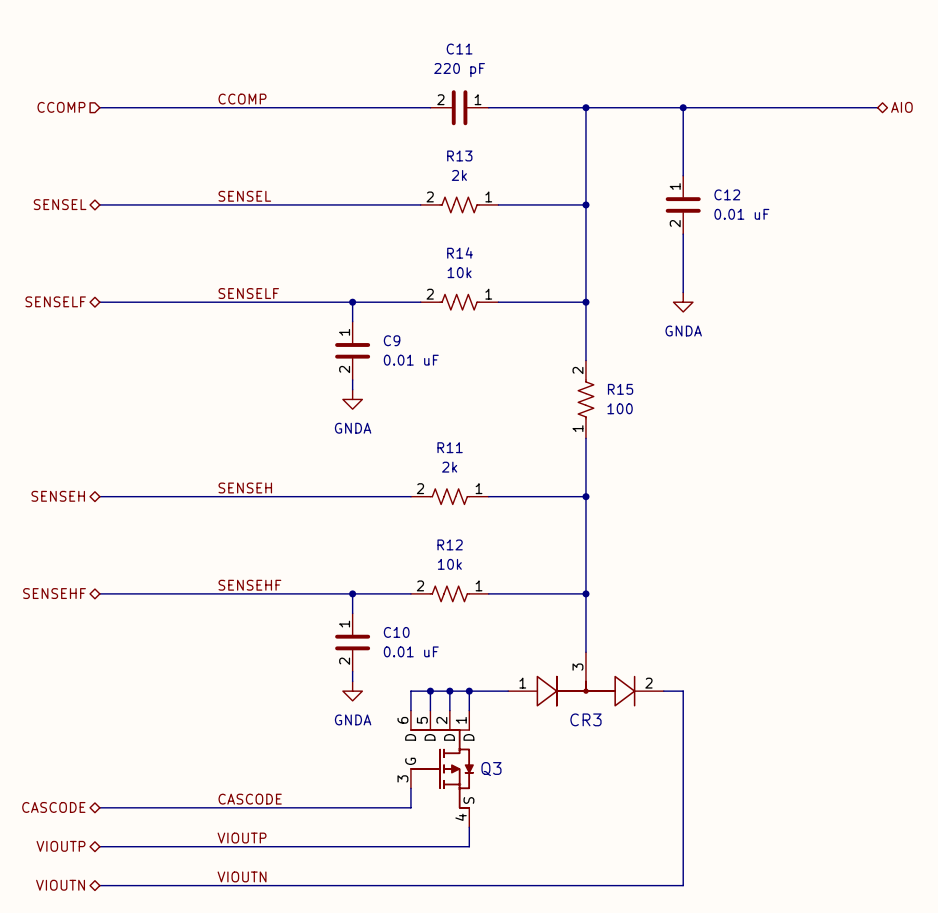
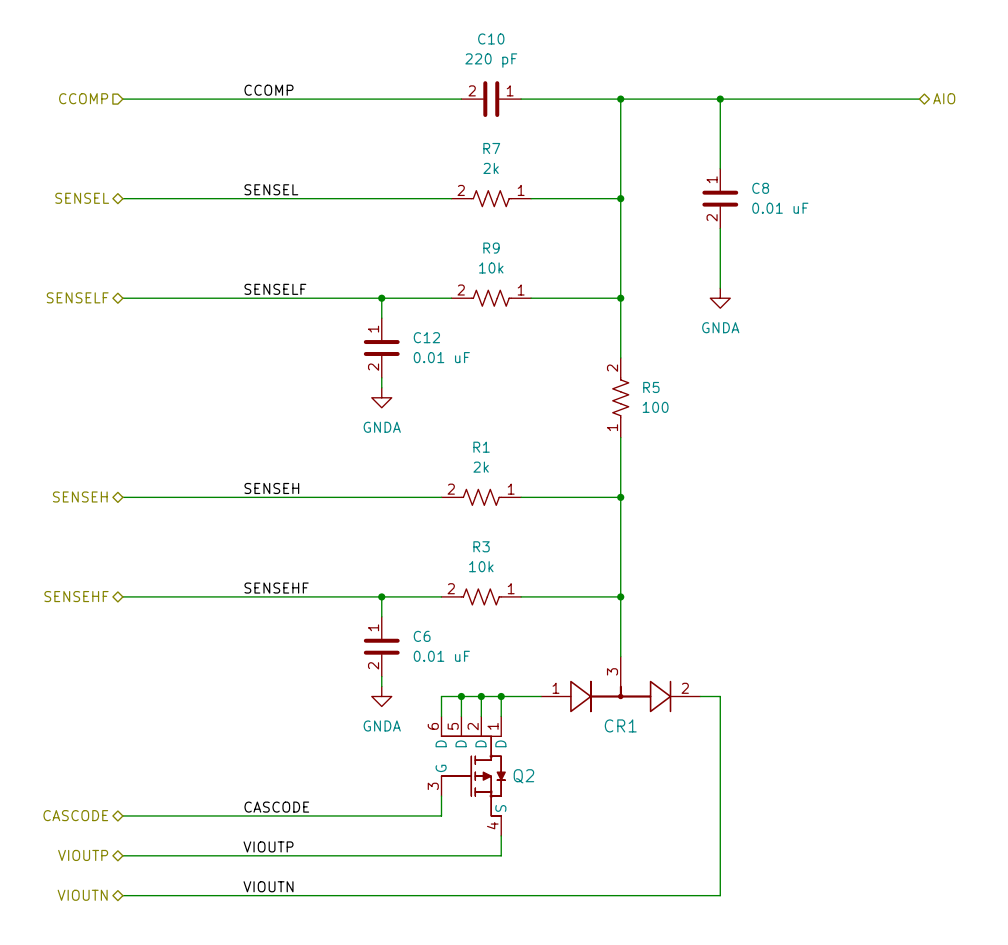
C11 name: C11 (459, 49) -> C10 (491, 38)
R13 name: R13 (459, 155) -> R7 (491, 148)
C12 name: C12 (727, 194) -> C8 (760, 188)
R14 name: R14 (460, 252) -> R9 (491, 248)
C9 name: C9 (392, 340) -> C12 (426, 337)
R15 name: R15 (620, 389) -> R5 (651, 387)
R11 name: R11 (450, 447) -> R1 (481, 447)
R12 name: R12 (450, 544) -> R3 (481, 546)
C10 name: C10 (396, 632) -> C6 (422, 636)
CR3 name: CR3 (585, 719) -> CR1 (620, 725)
Q3 name: Q3 (491, 769) -> Q2 (523, 776)

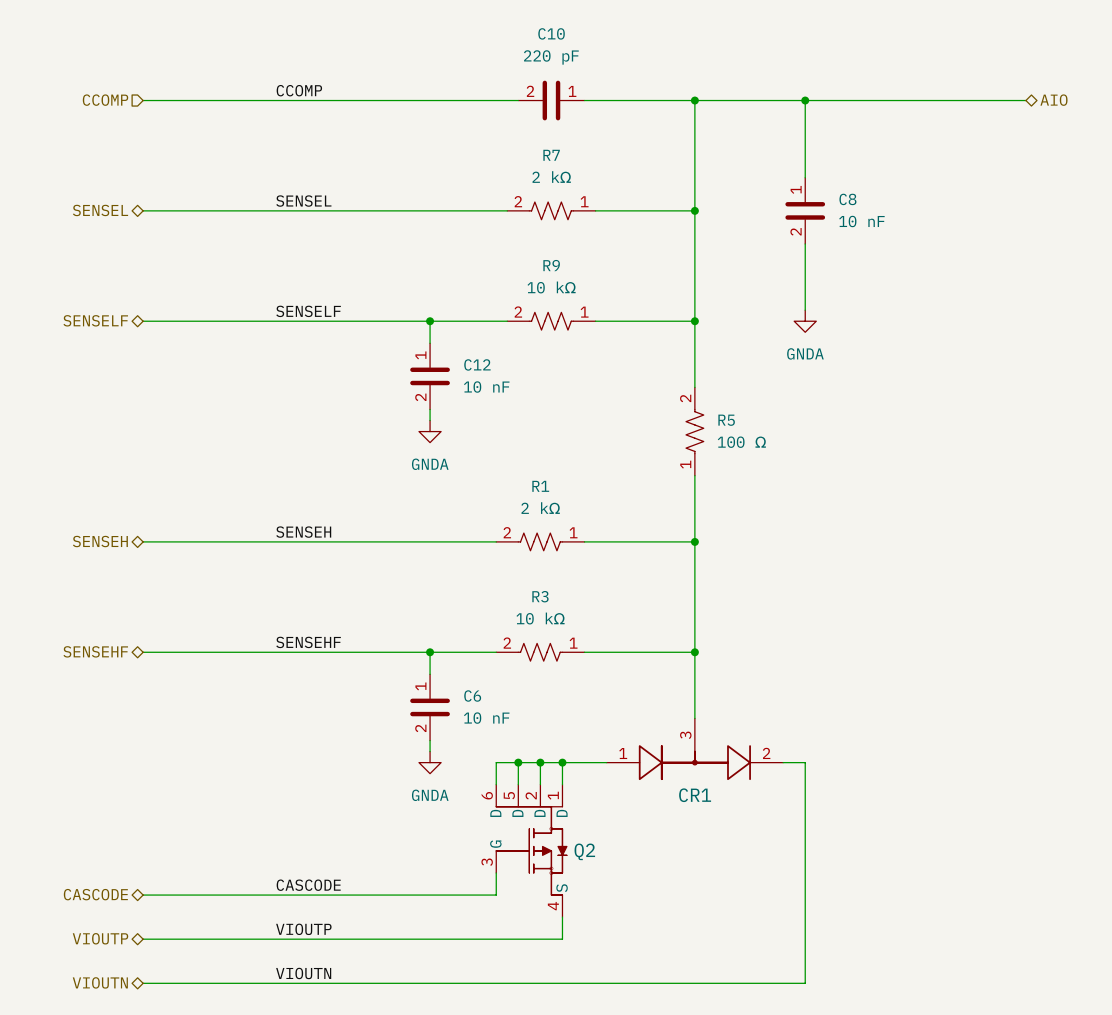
R7 value: 2k (491, 168) -> 2 kΩ (551, 177)
C8 value: 0.01 uF (780, 208) -> 10 nF (861, 221)
R9 value: 10k (491, 267) -> 10 kΩ (551, 287)
C12 value: 0.01 uF (441, 357) -> 10 nF (486, 387)
R5 value: 100 (655, 407) -> 100 Ω (741, 442)
R1 value: 2k (481, 467) -> 2 kΩ (540, 508)
R3 value: 10k (481, 566) -> 10 kΩ (540, 618)
C6 value: 0.01 uF (441, 656) -> 10 nF (486, 718)

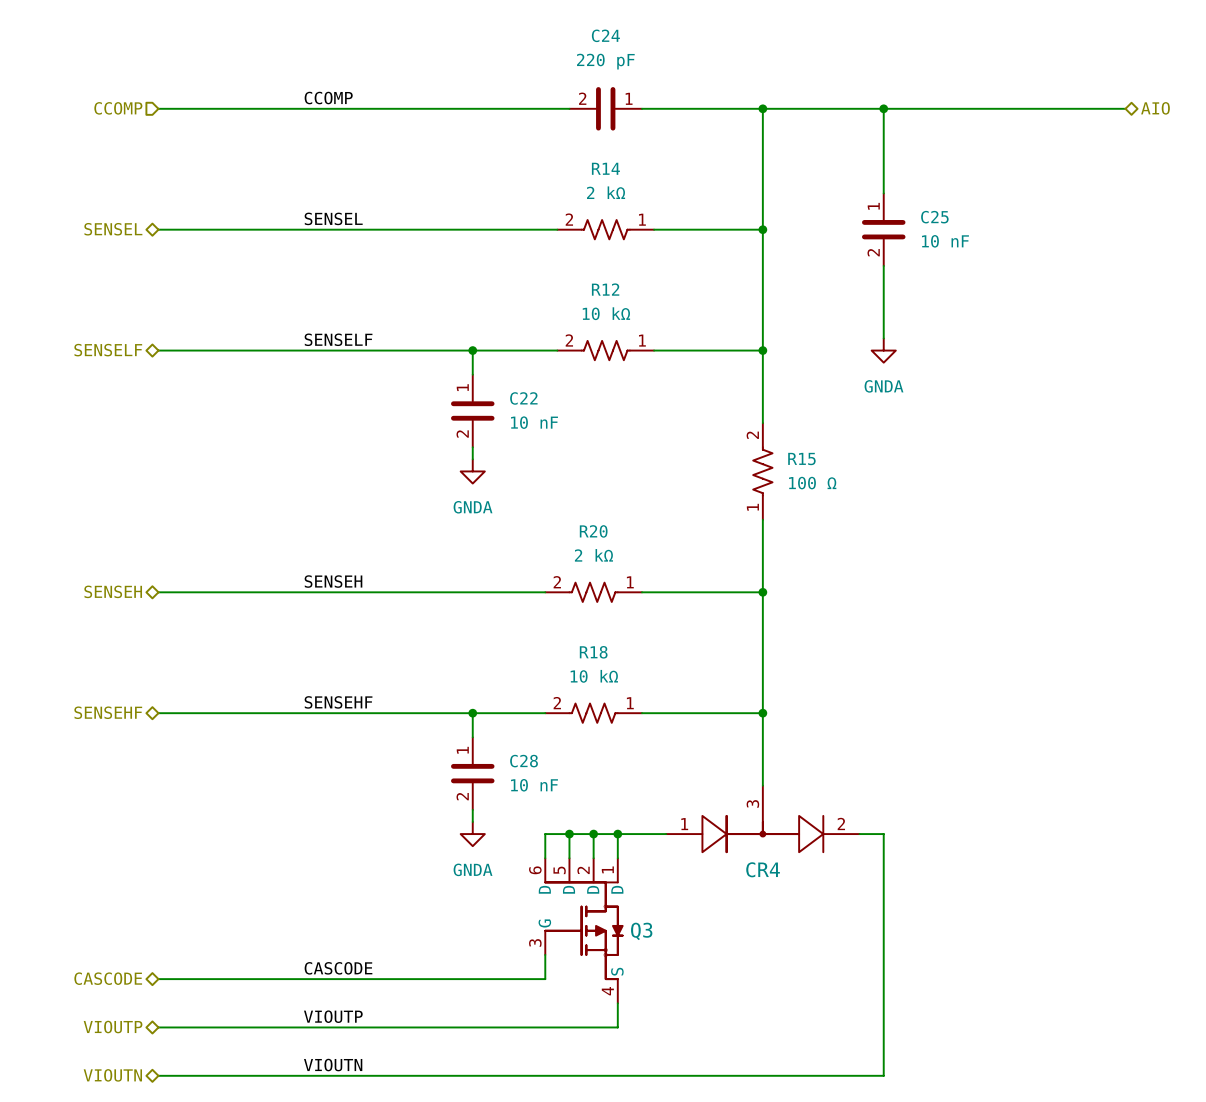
C10 name: C10 (551, 33) -> C24 (605, 35)
R7 name: R7 (551, 155) -> R14 (605, 168)
C8 name: C8 (847, 199) -> C25 (934, 217)
R9 name: R9 (551, 265) -> R12 (605, 289)
C12 name: C12 (477, 364) -> C22 (523, 398)
R5 name: R5 (726, 420) -> R15 (801, 459)
R1 name: R1 (540, 486) -> R20 (593, 531)
R3 name: R3 (540, 596) -> R18 (593, 652)
C6 name: C6 (472, 696) -> C28 (524, 761)
CR1 name: CR1 (695, 795) -> CR4 (763, 869)
Q2 name: Q2 (584, 851) -> Q3 (641, 931)

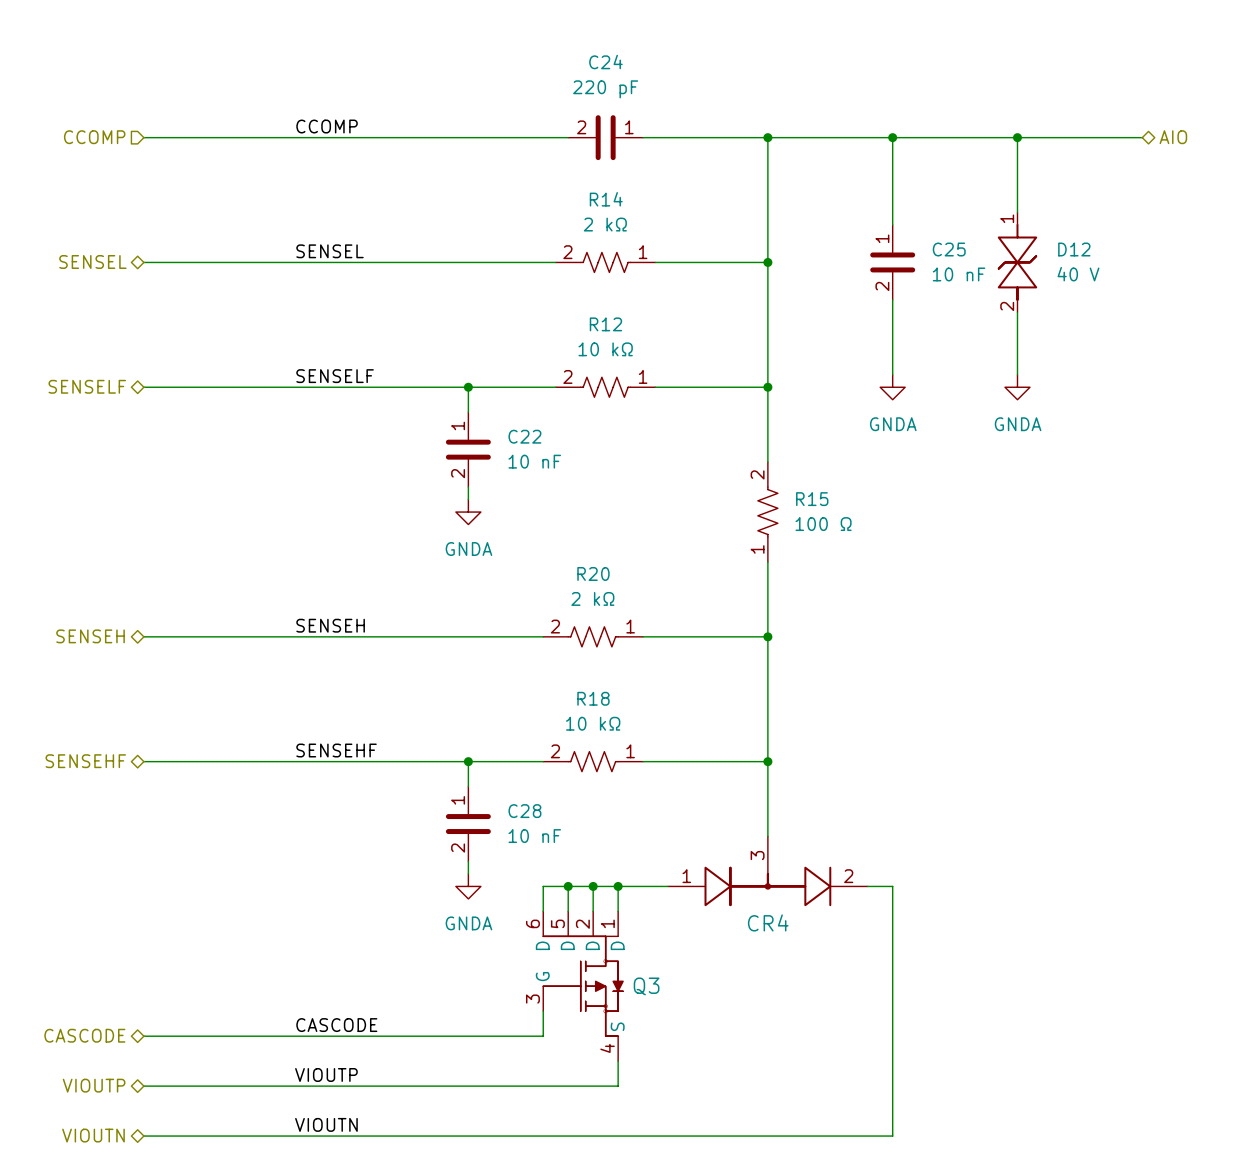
wire: none -> (1017, 137) (1017, 212)
junction: none -> (1017, 137)
D12: none -> 40 V (1017, 262)
wire: none -> (1017, 312) (1017, 374)
power symbol: none -> GNDA (1017, 387)

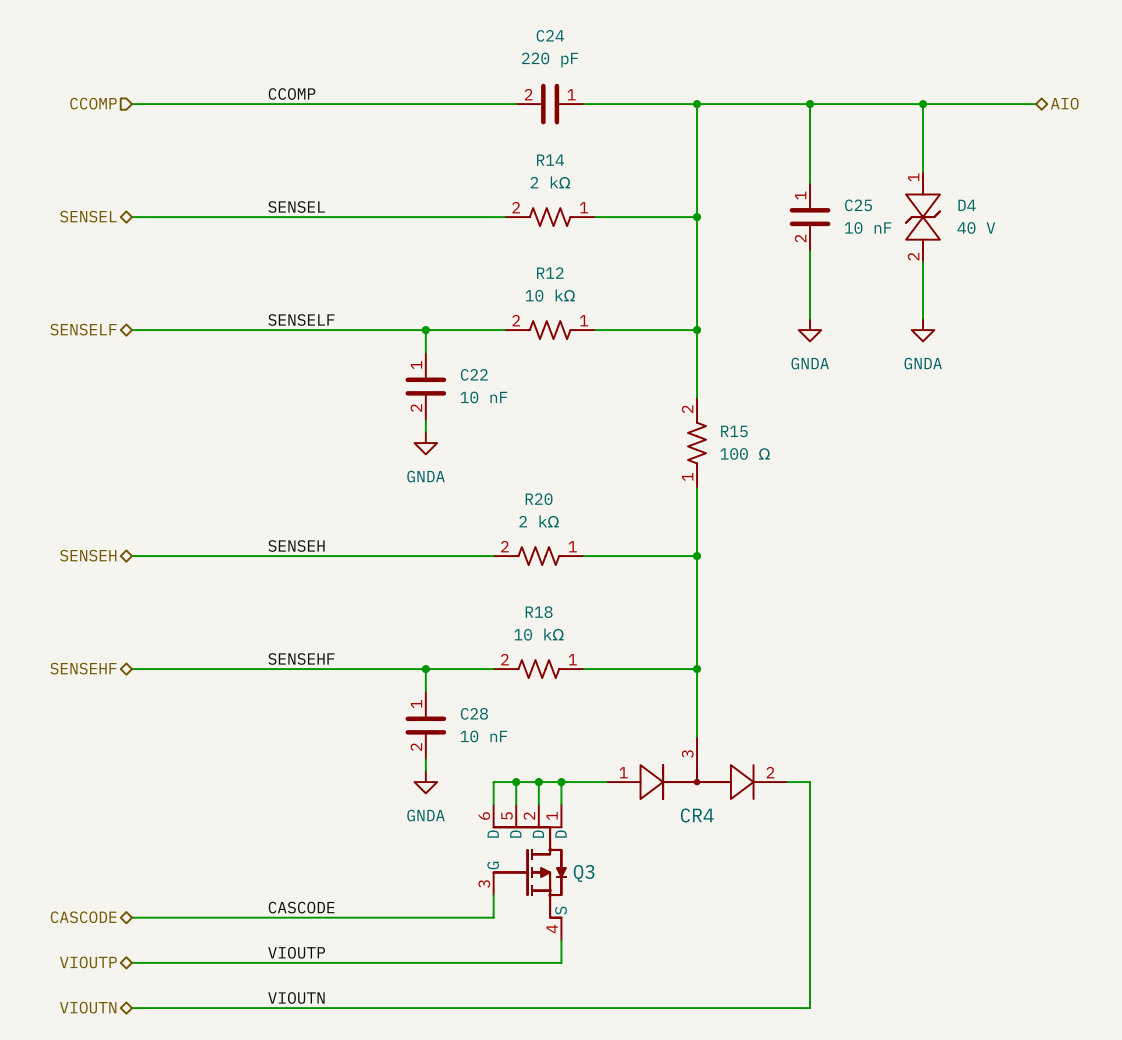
D12 name: D12 (1074, 249) -> D4 (967, 205)

